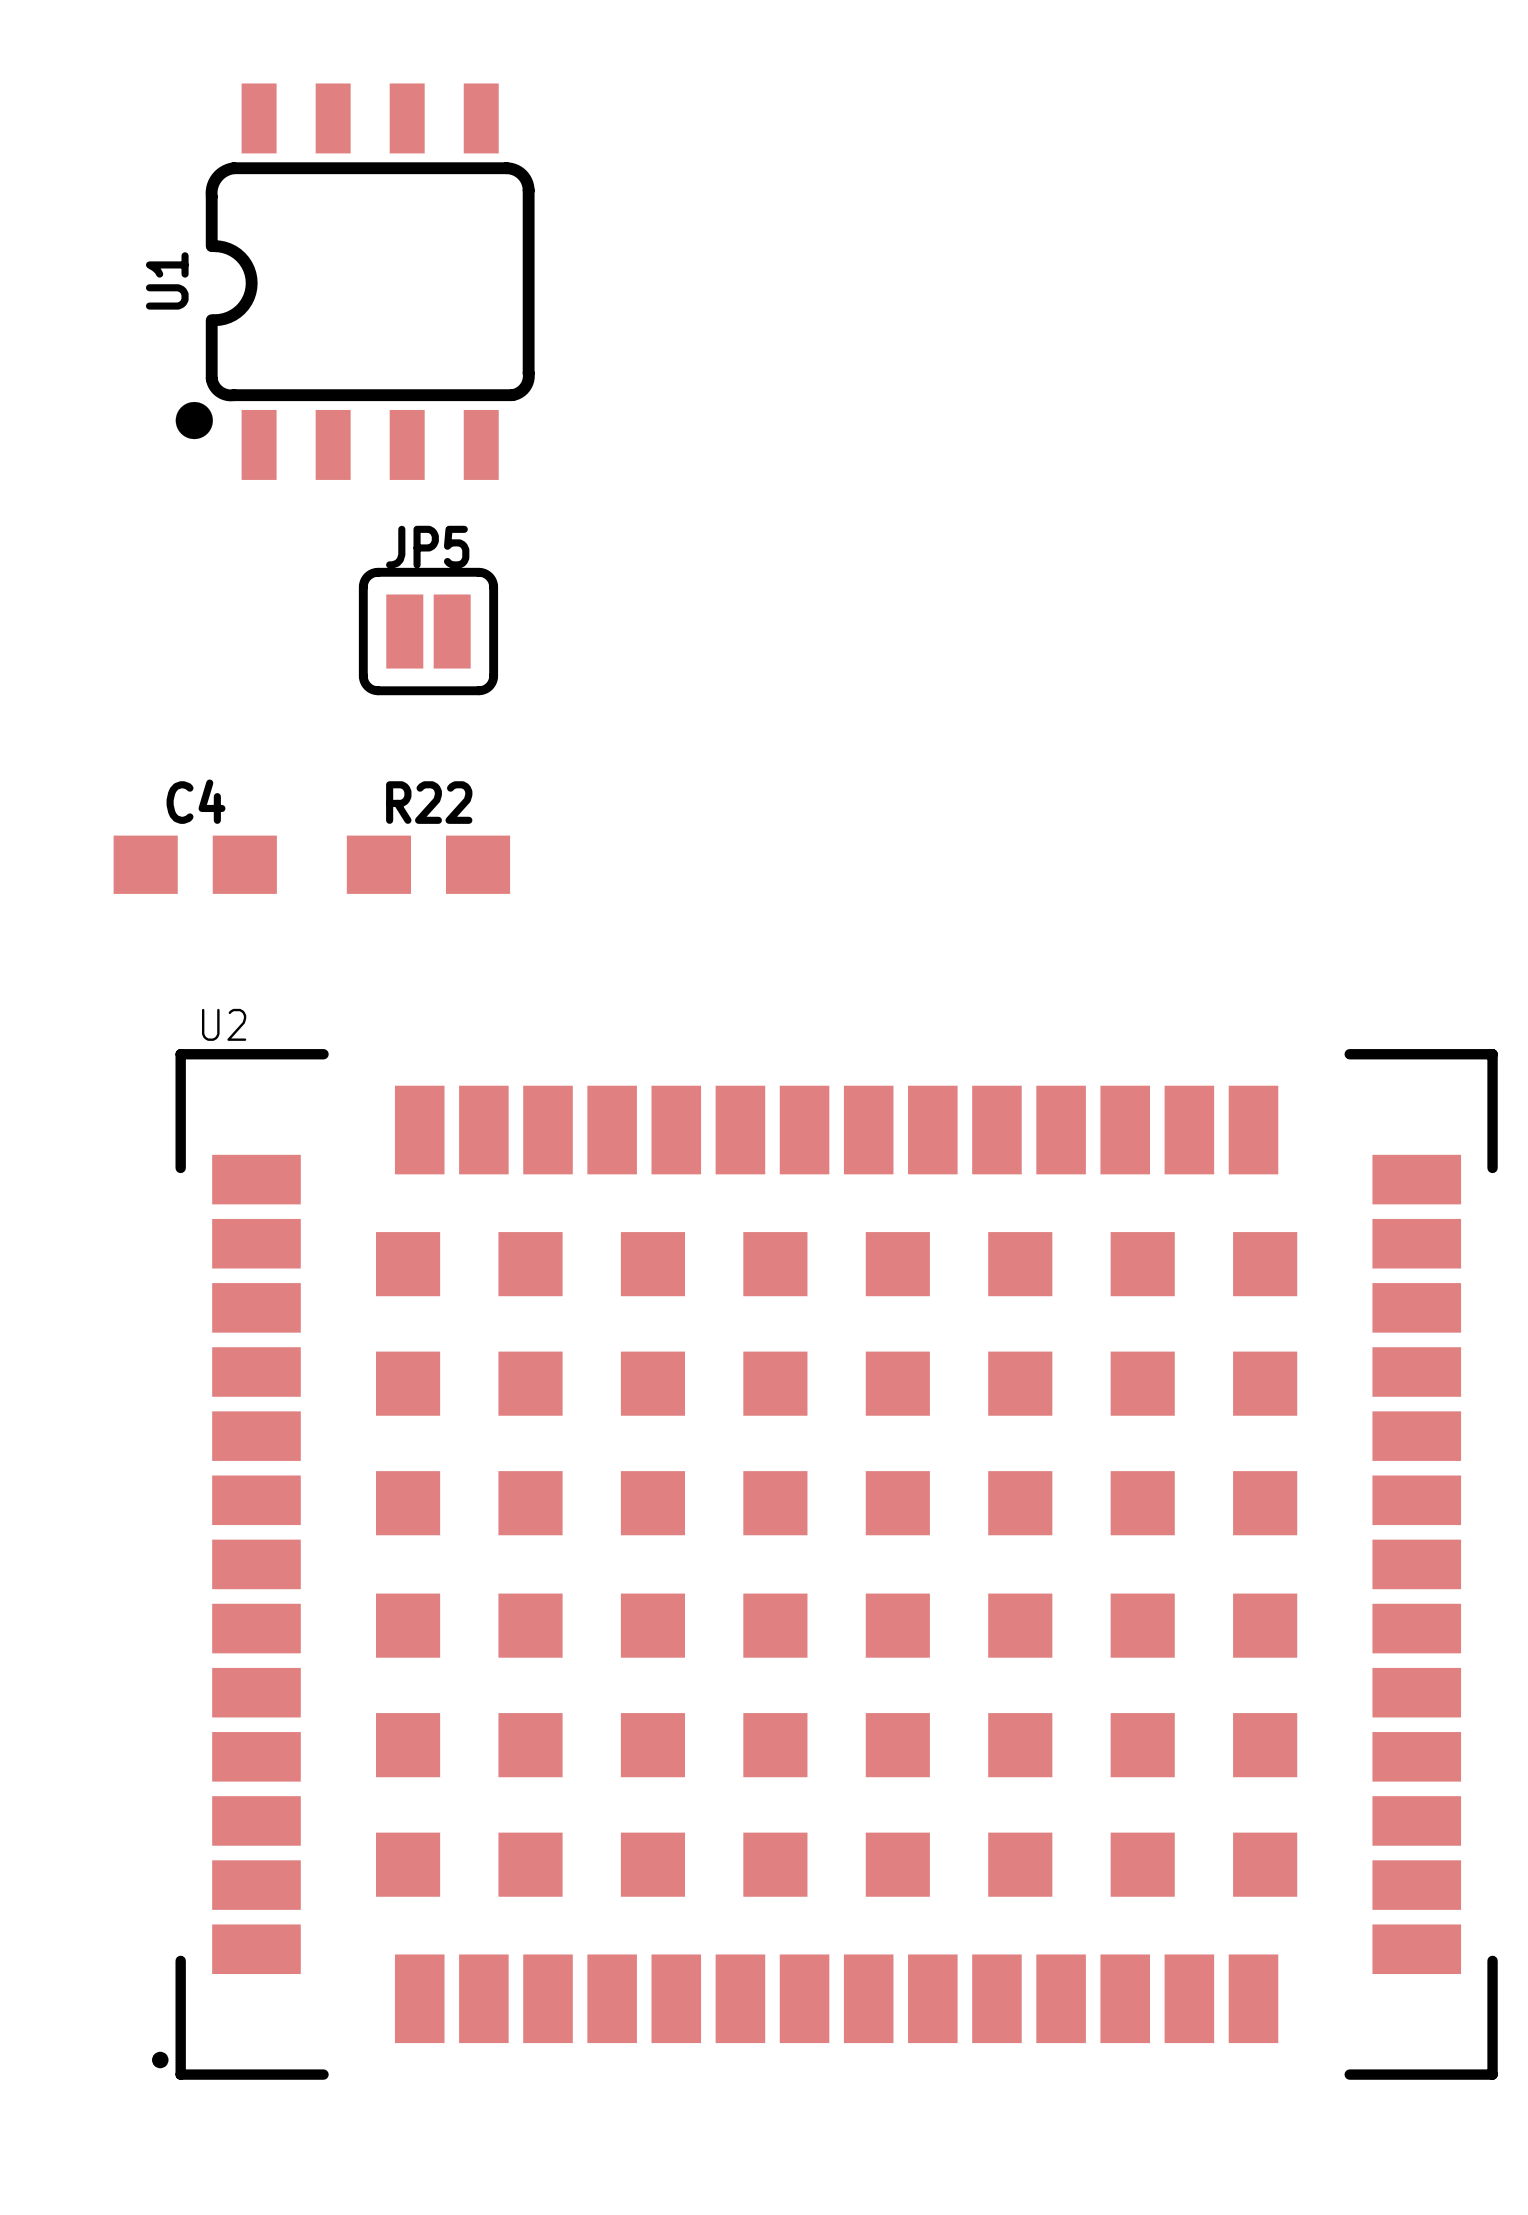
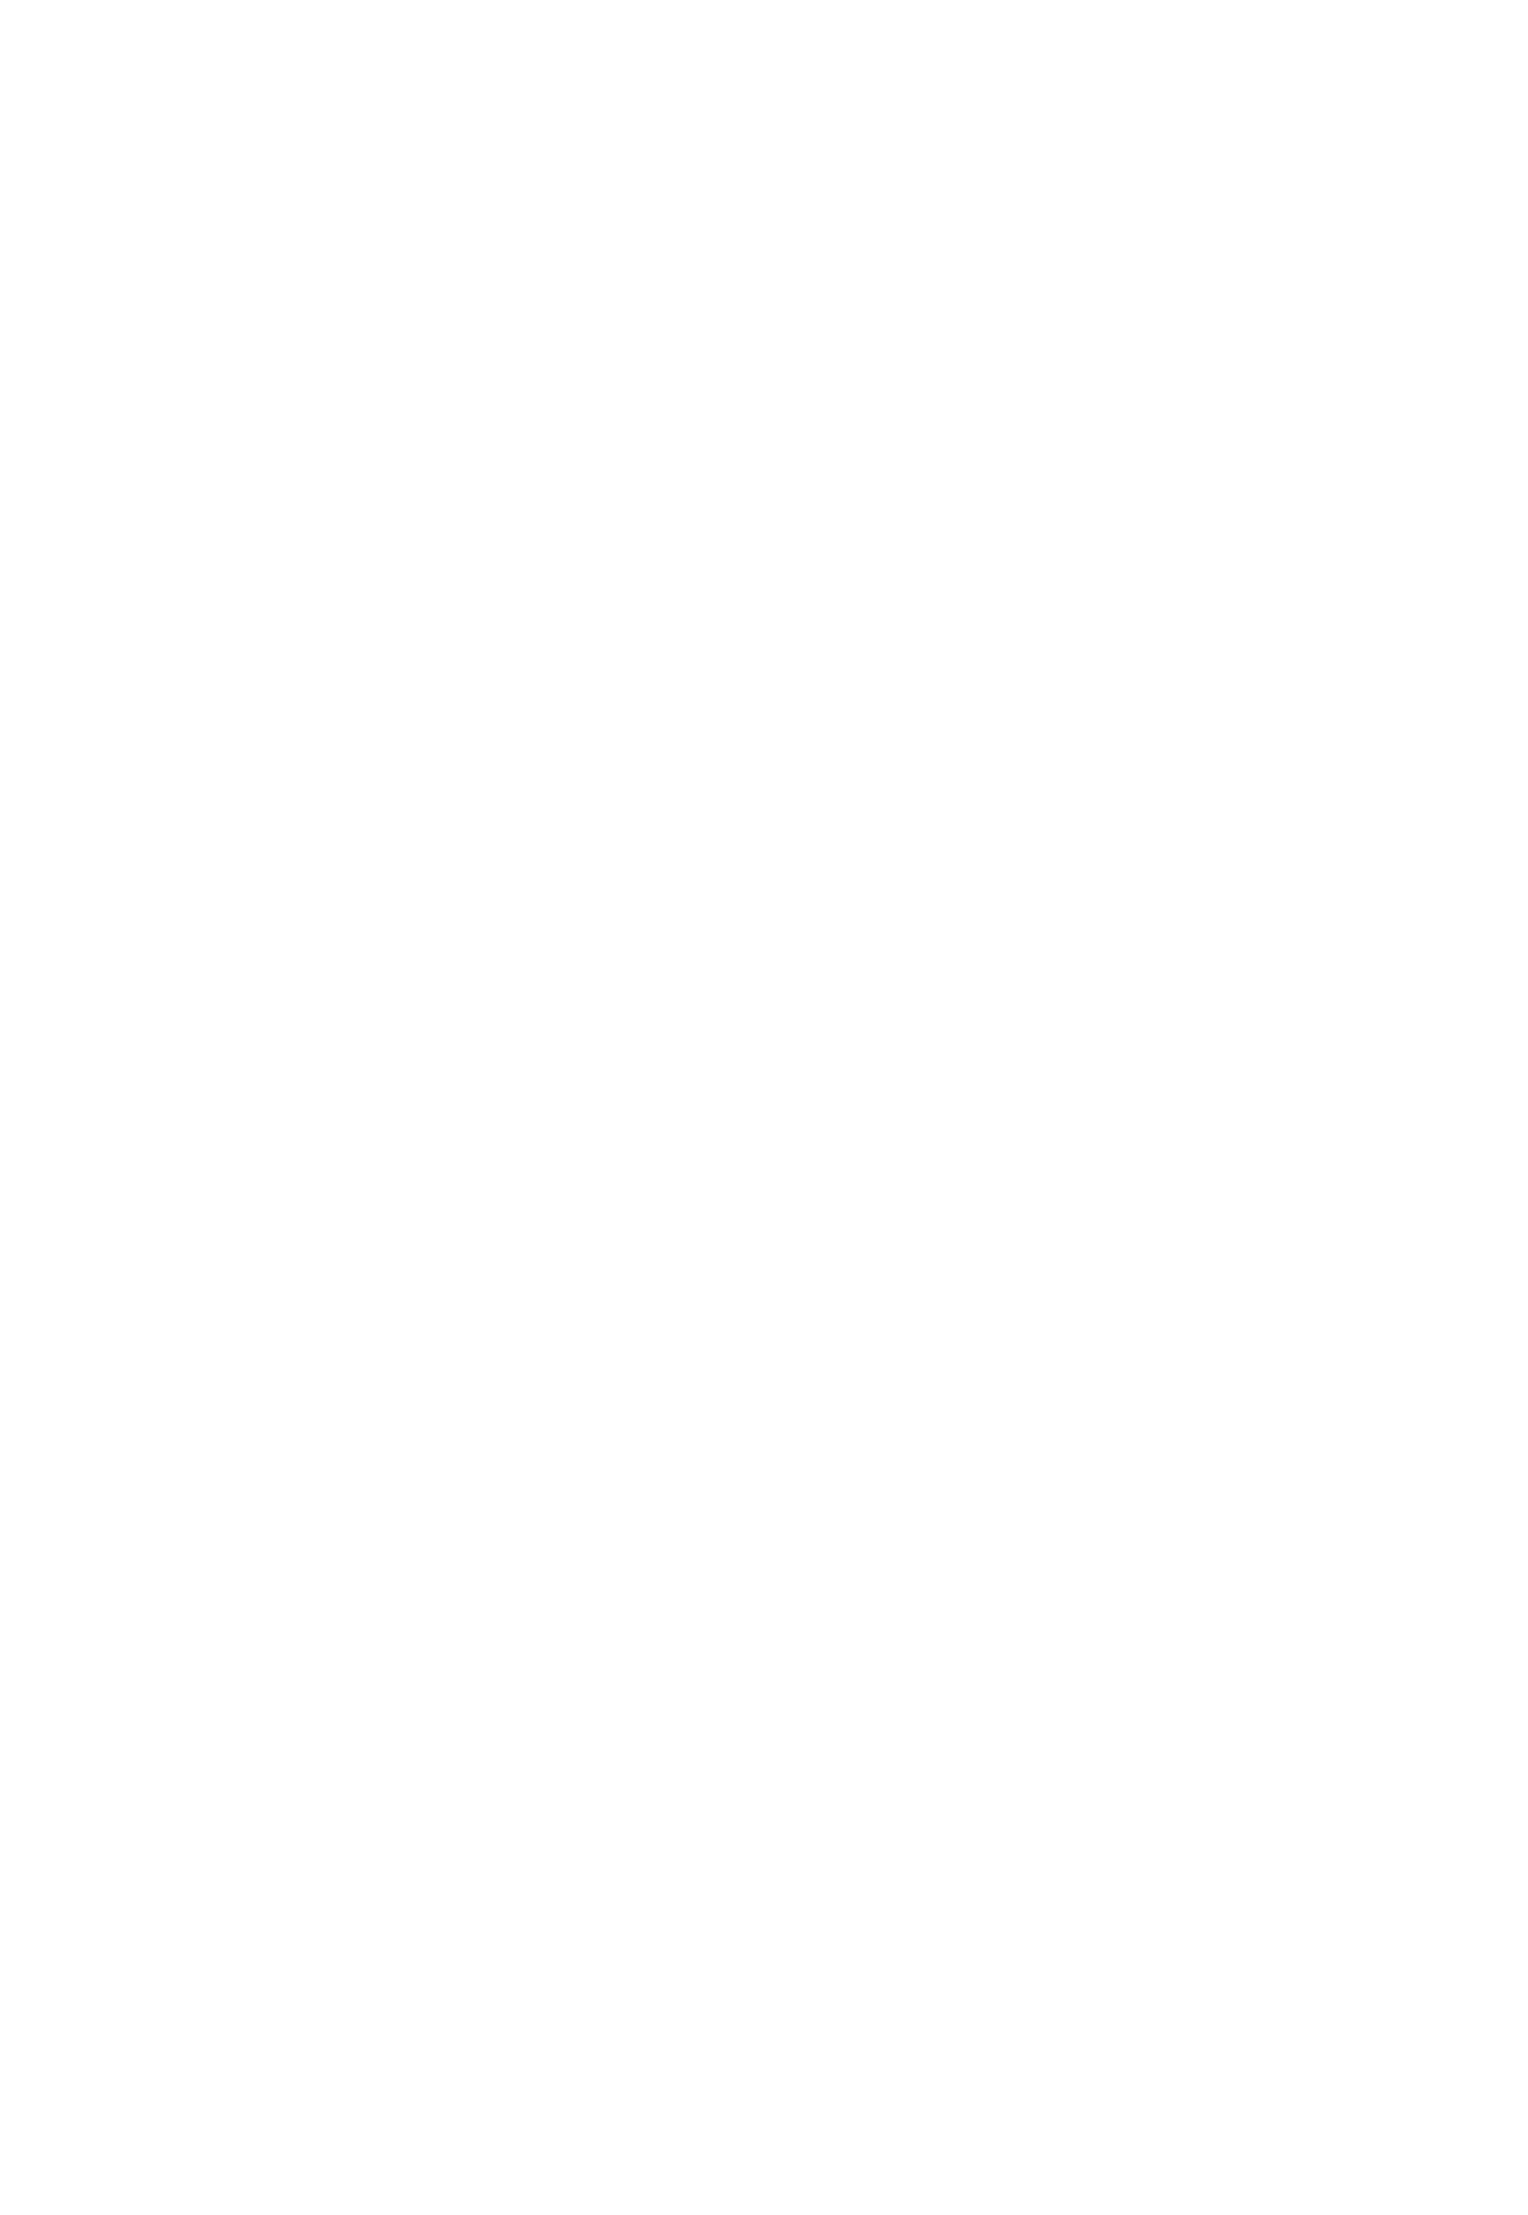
U1: (355, 281) -> none
JP5: (428, 631) -> none
C4: (195, 864) -> none
R22: (428, 864) -> none
U2: (824, 1564) -> none

